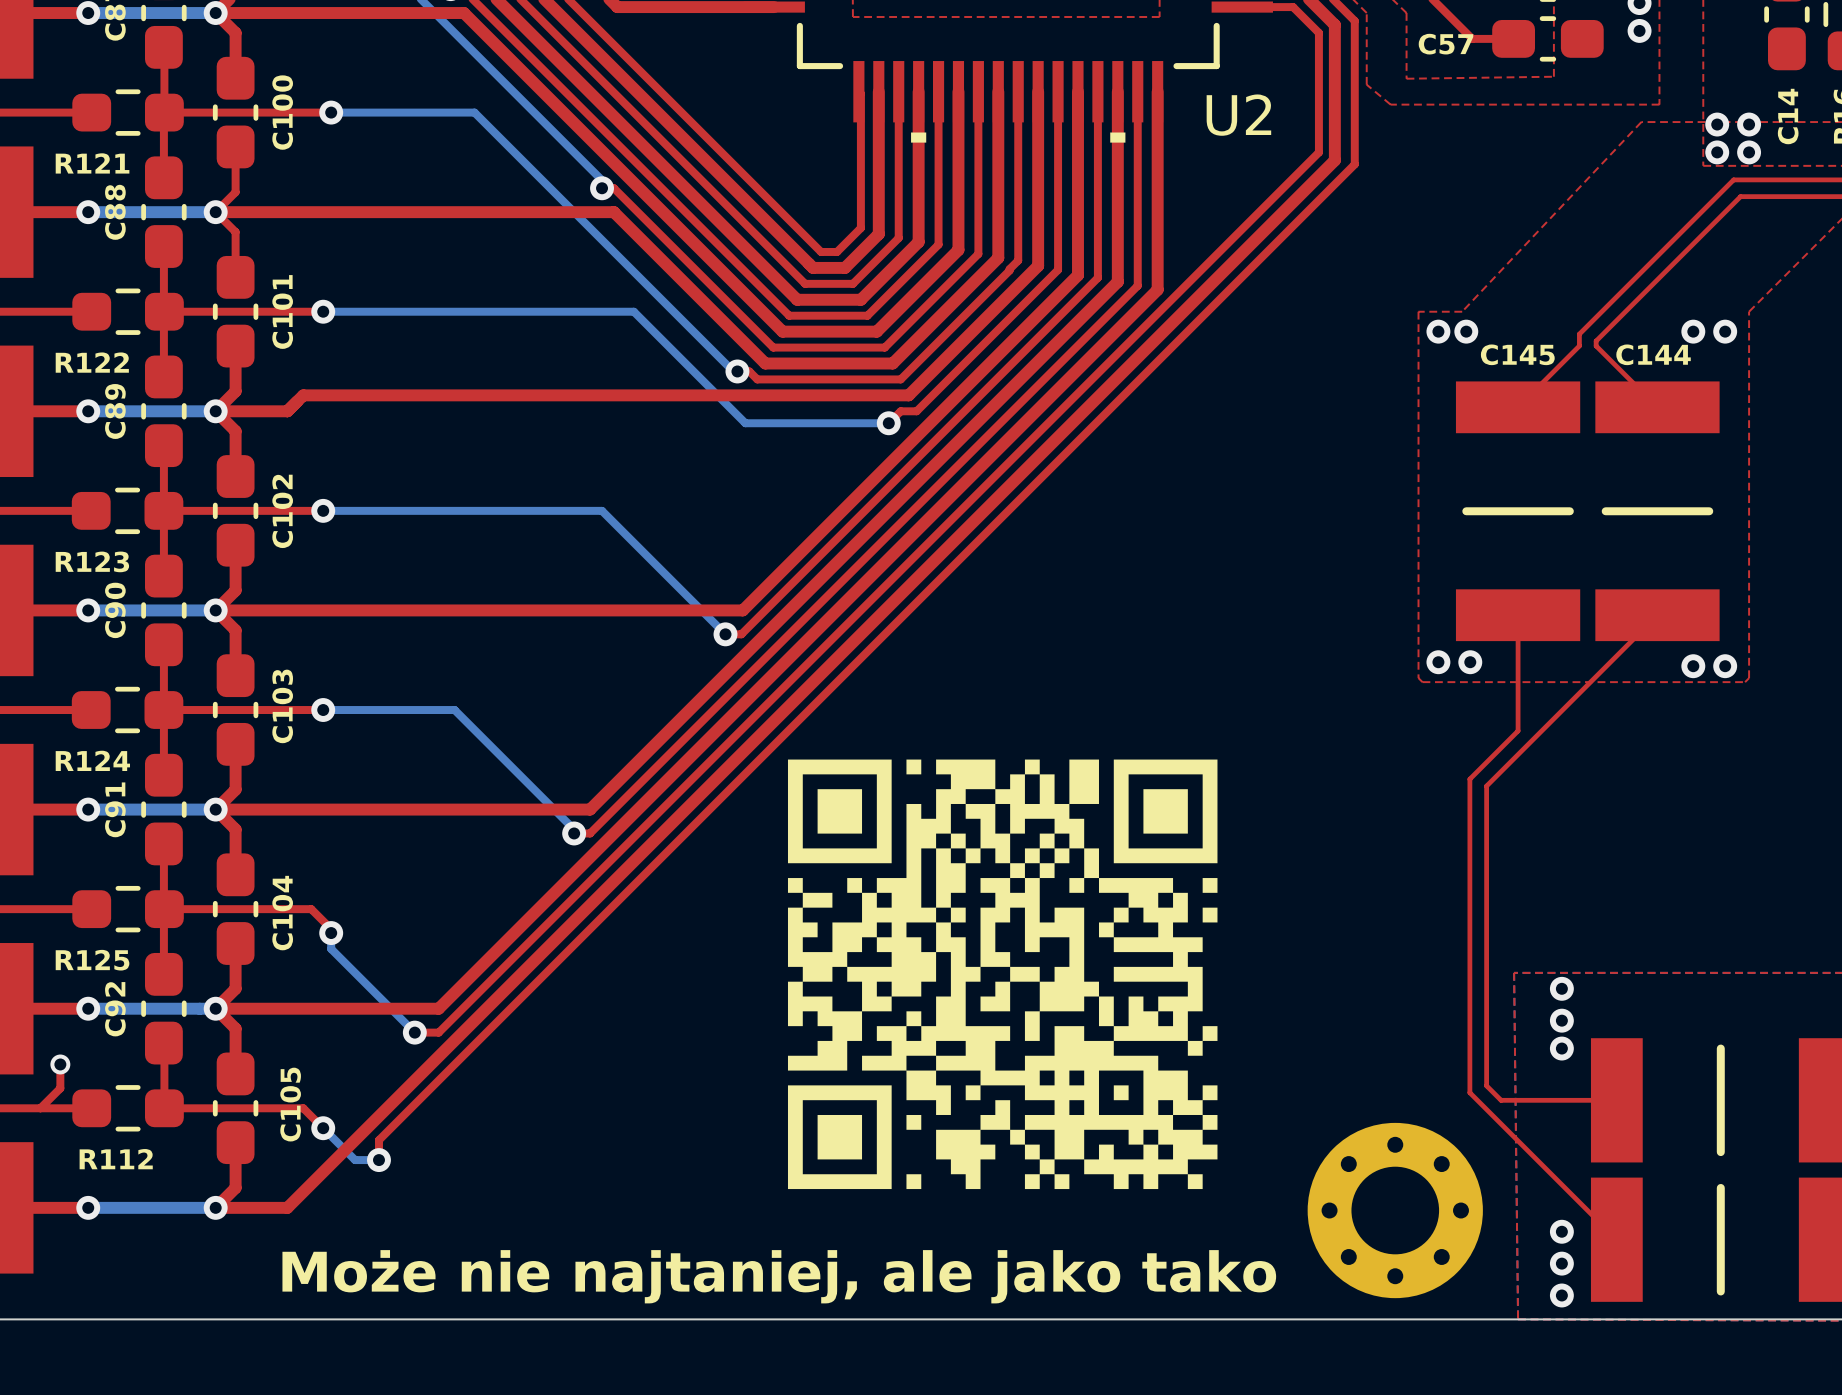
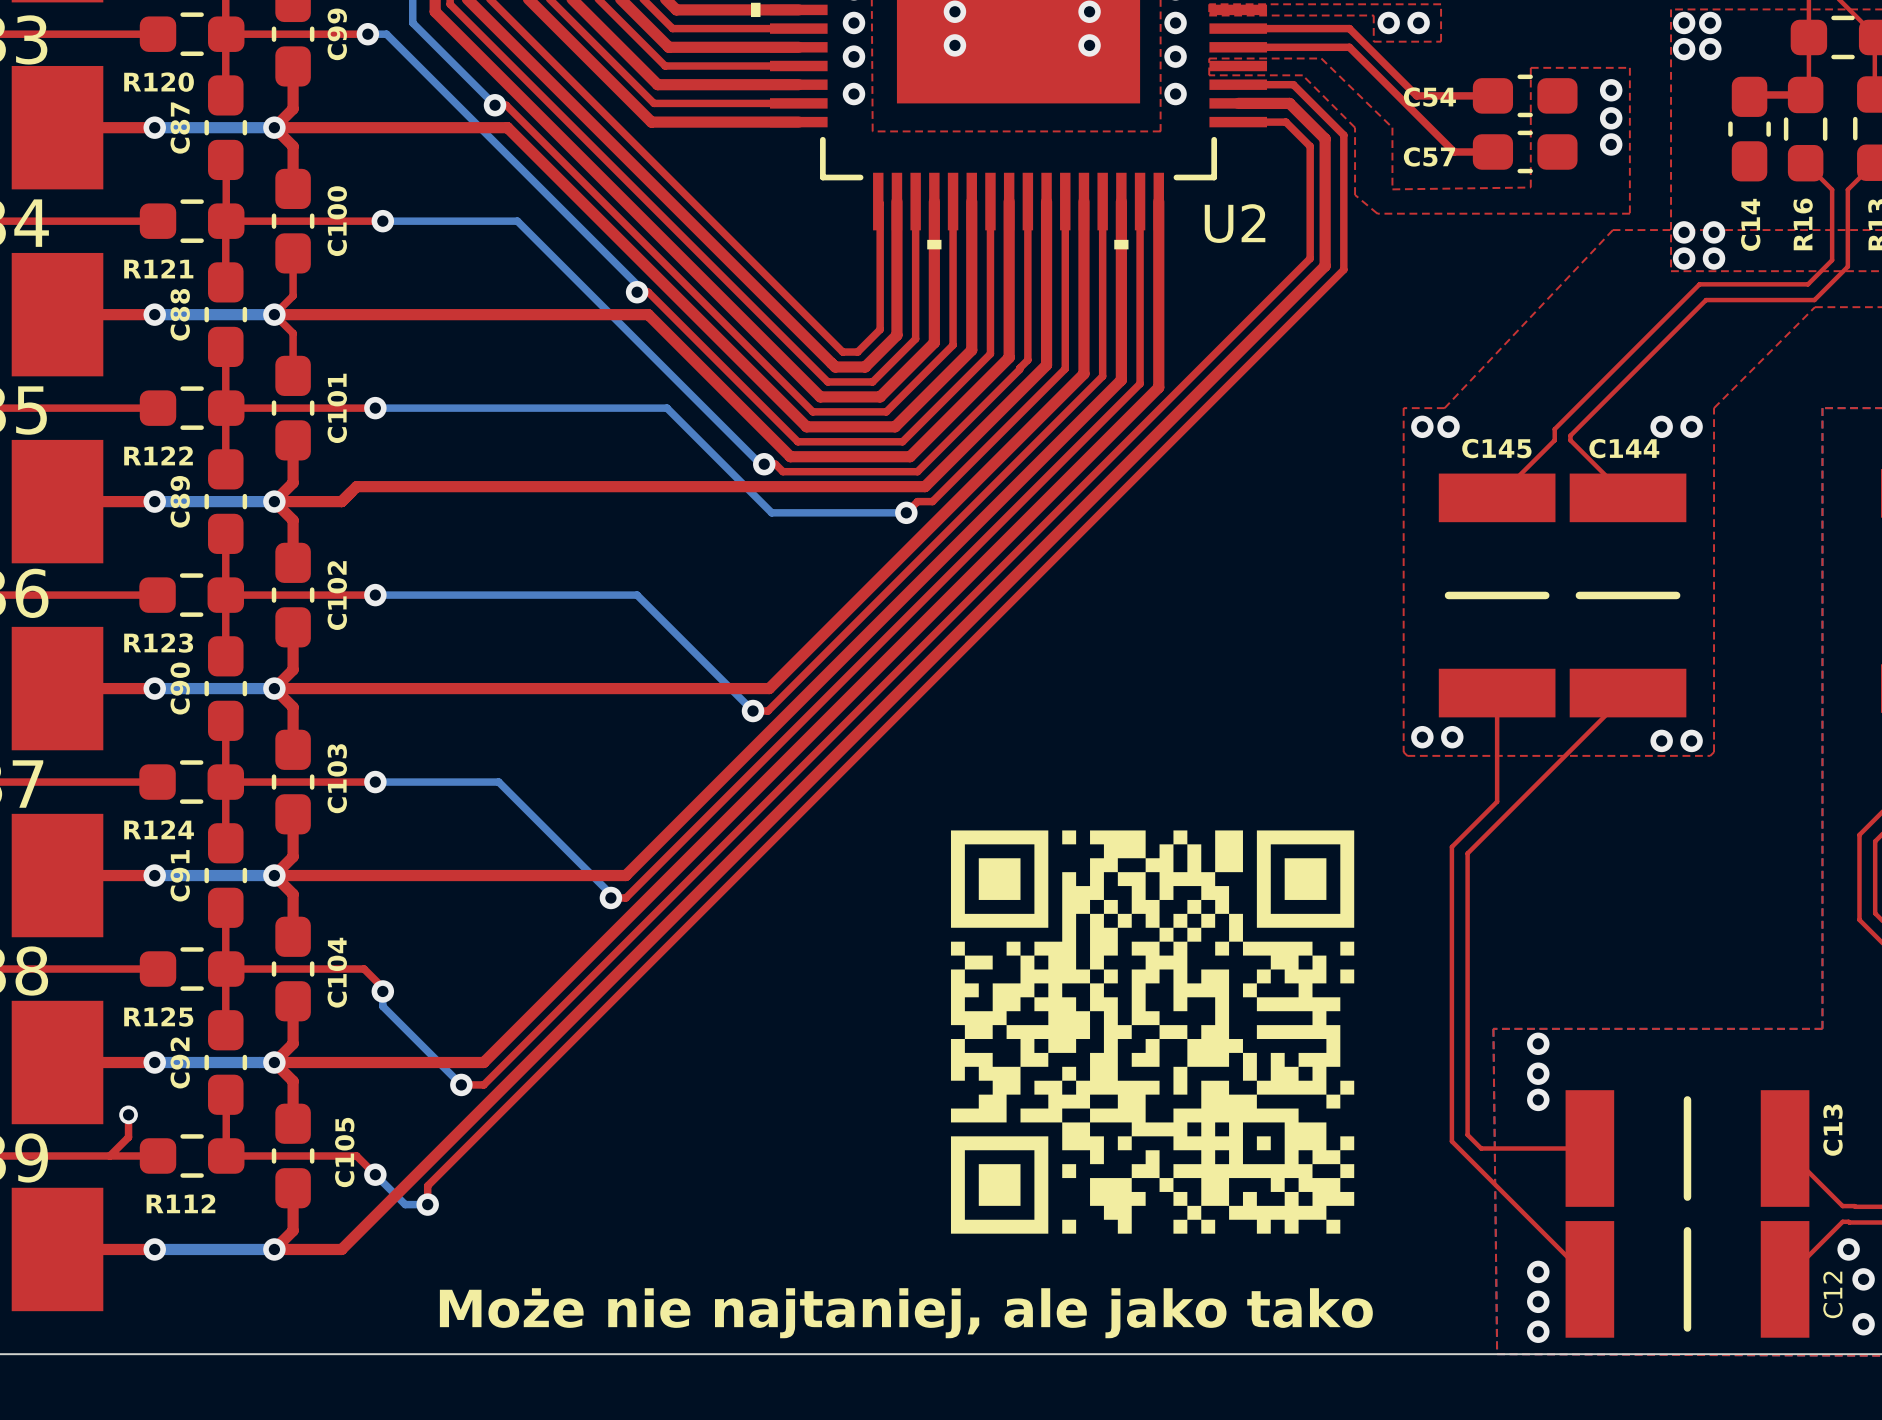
drawing position: (1002, 974) -> (1152, 1032)
part: (1395, 1210) -> none
text position: Może nie najtaniej, ale jako tako (779, 1276) -> Może nie najtaniej, ale jako tako (906, 1313)

